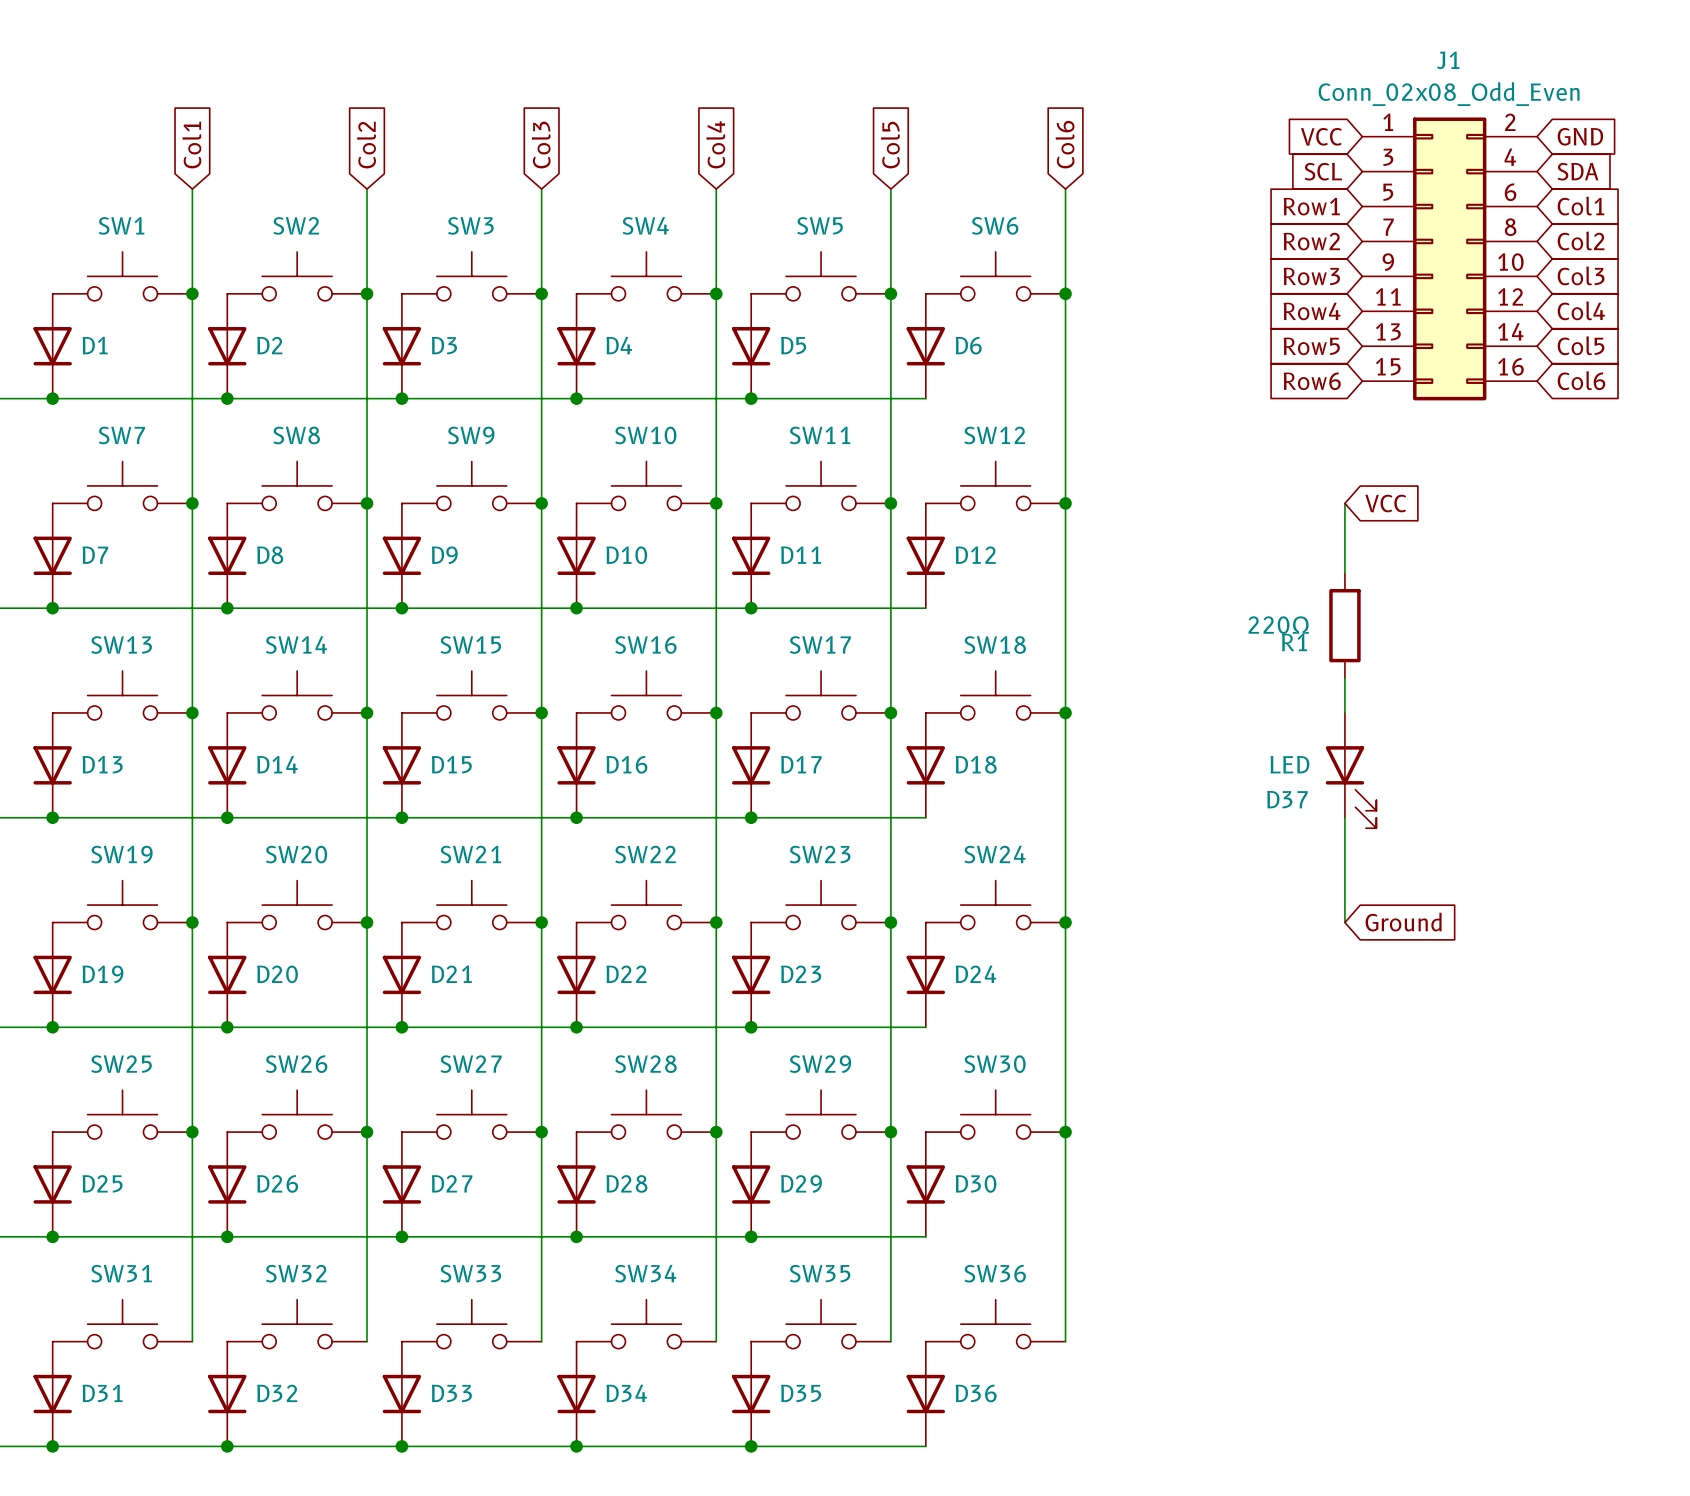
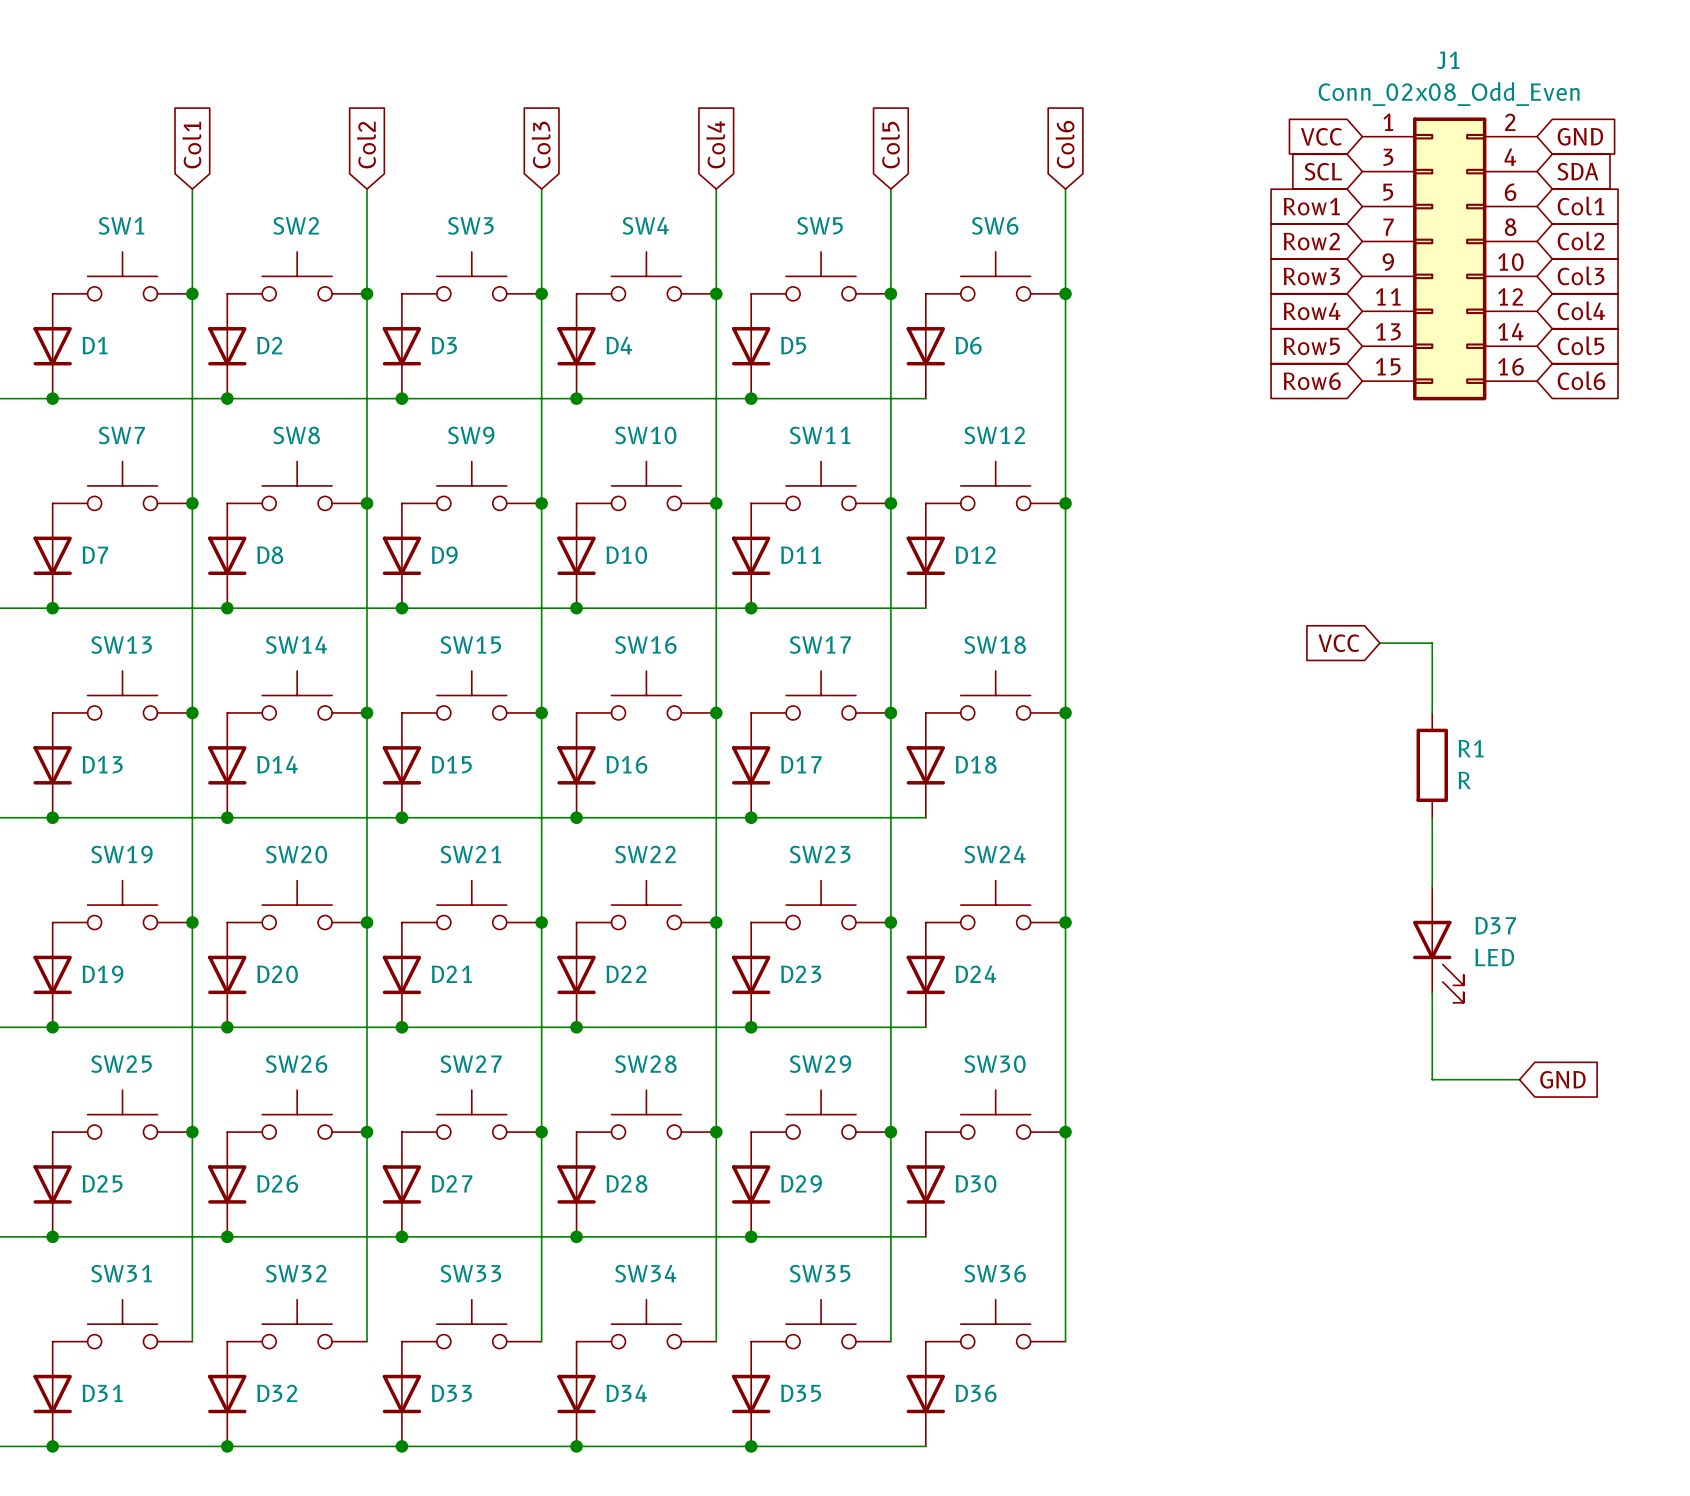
wire: (1344, 503) (1344, 573) -> (1432, 817) (1432, 887)
global label rotation: 0° (1385, 503) -> 180° (1338, 643)
global label position: VCC (1385, 503) -> VCC (1338, 643)
R1 value: 220Ω (1278, 625) -> R (1464, 780)
R1 position: (1344, 625) -> (1432, 765)
R1 name position: R1 (1294, 642) -> R1 (1471, 748)
wire: none -> (1379, 643) (1432, 643) (1432, 712)
wire: (1344, 678) (1344, 712) -> none
D37 value position: LED (1289, 764) -> LED (1494, 957)
D37 position: (1351, 770) -> (1438, 945)
D37 name position: D37 (1287, 799) -> D37 (1495, 925)
wire: (1344, 817) (1344, 922) -> none
global label: Ground (1403, 922) -> none
wire: none -> (1432, 992) (1432, 1079) (1519, 1079)
global label: none -> GND (1562, 1079)

